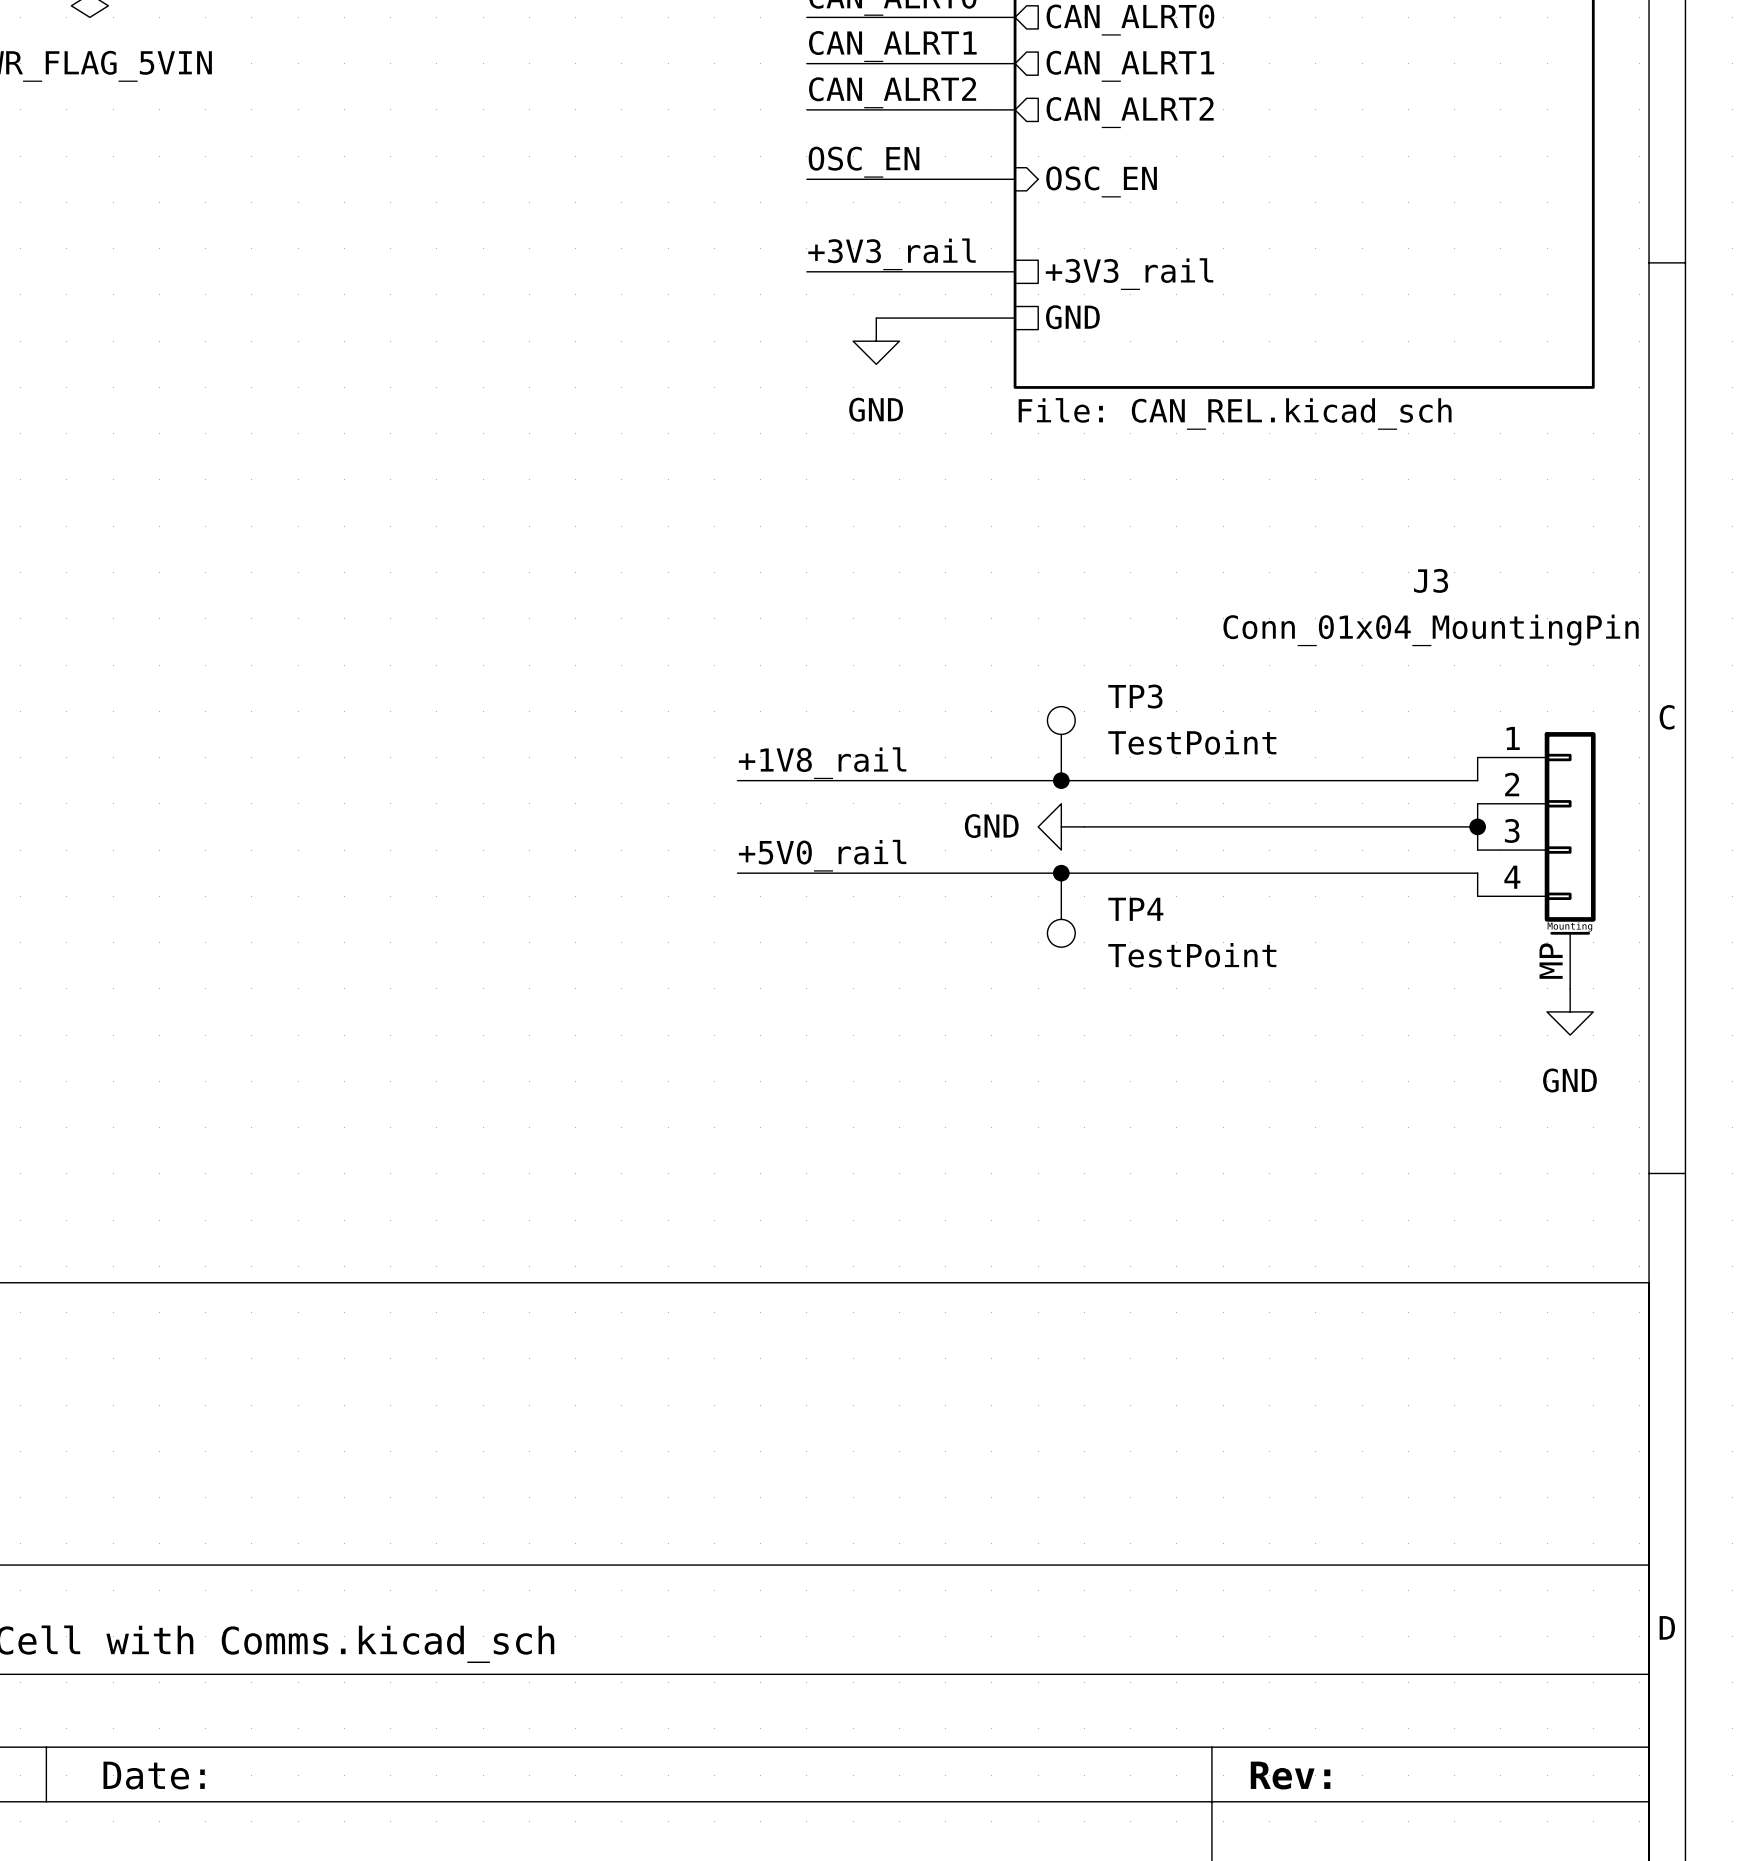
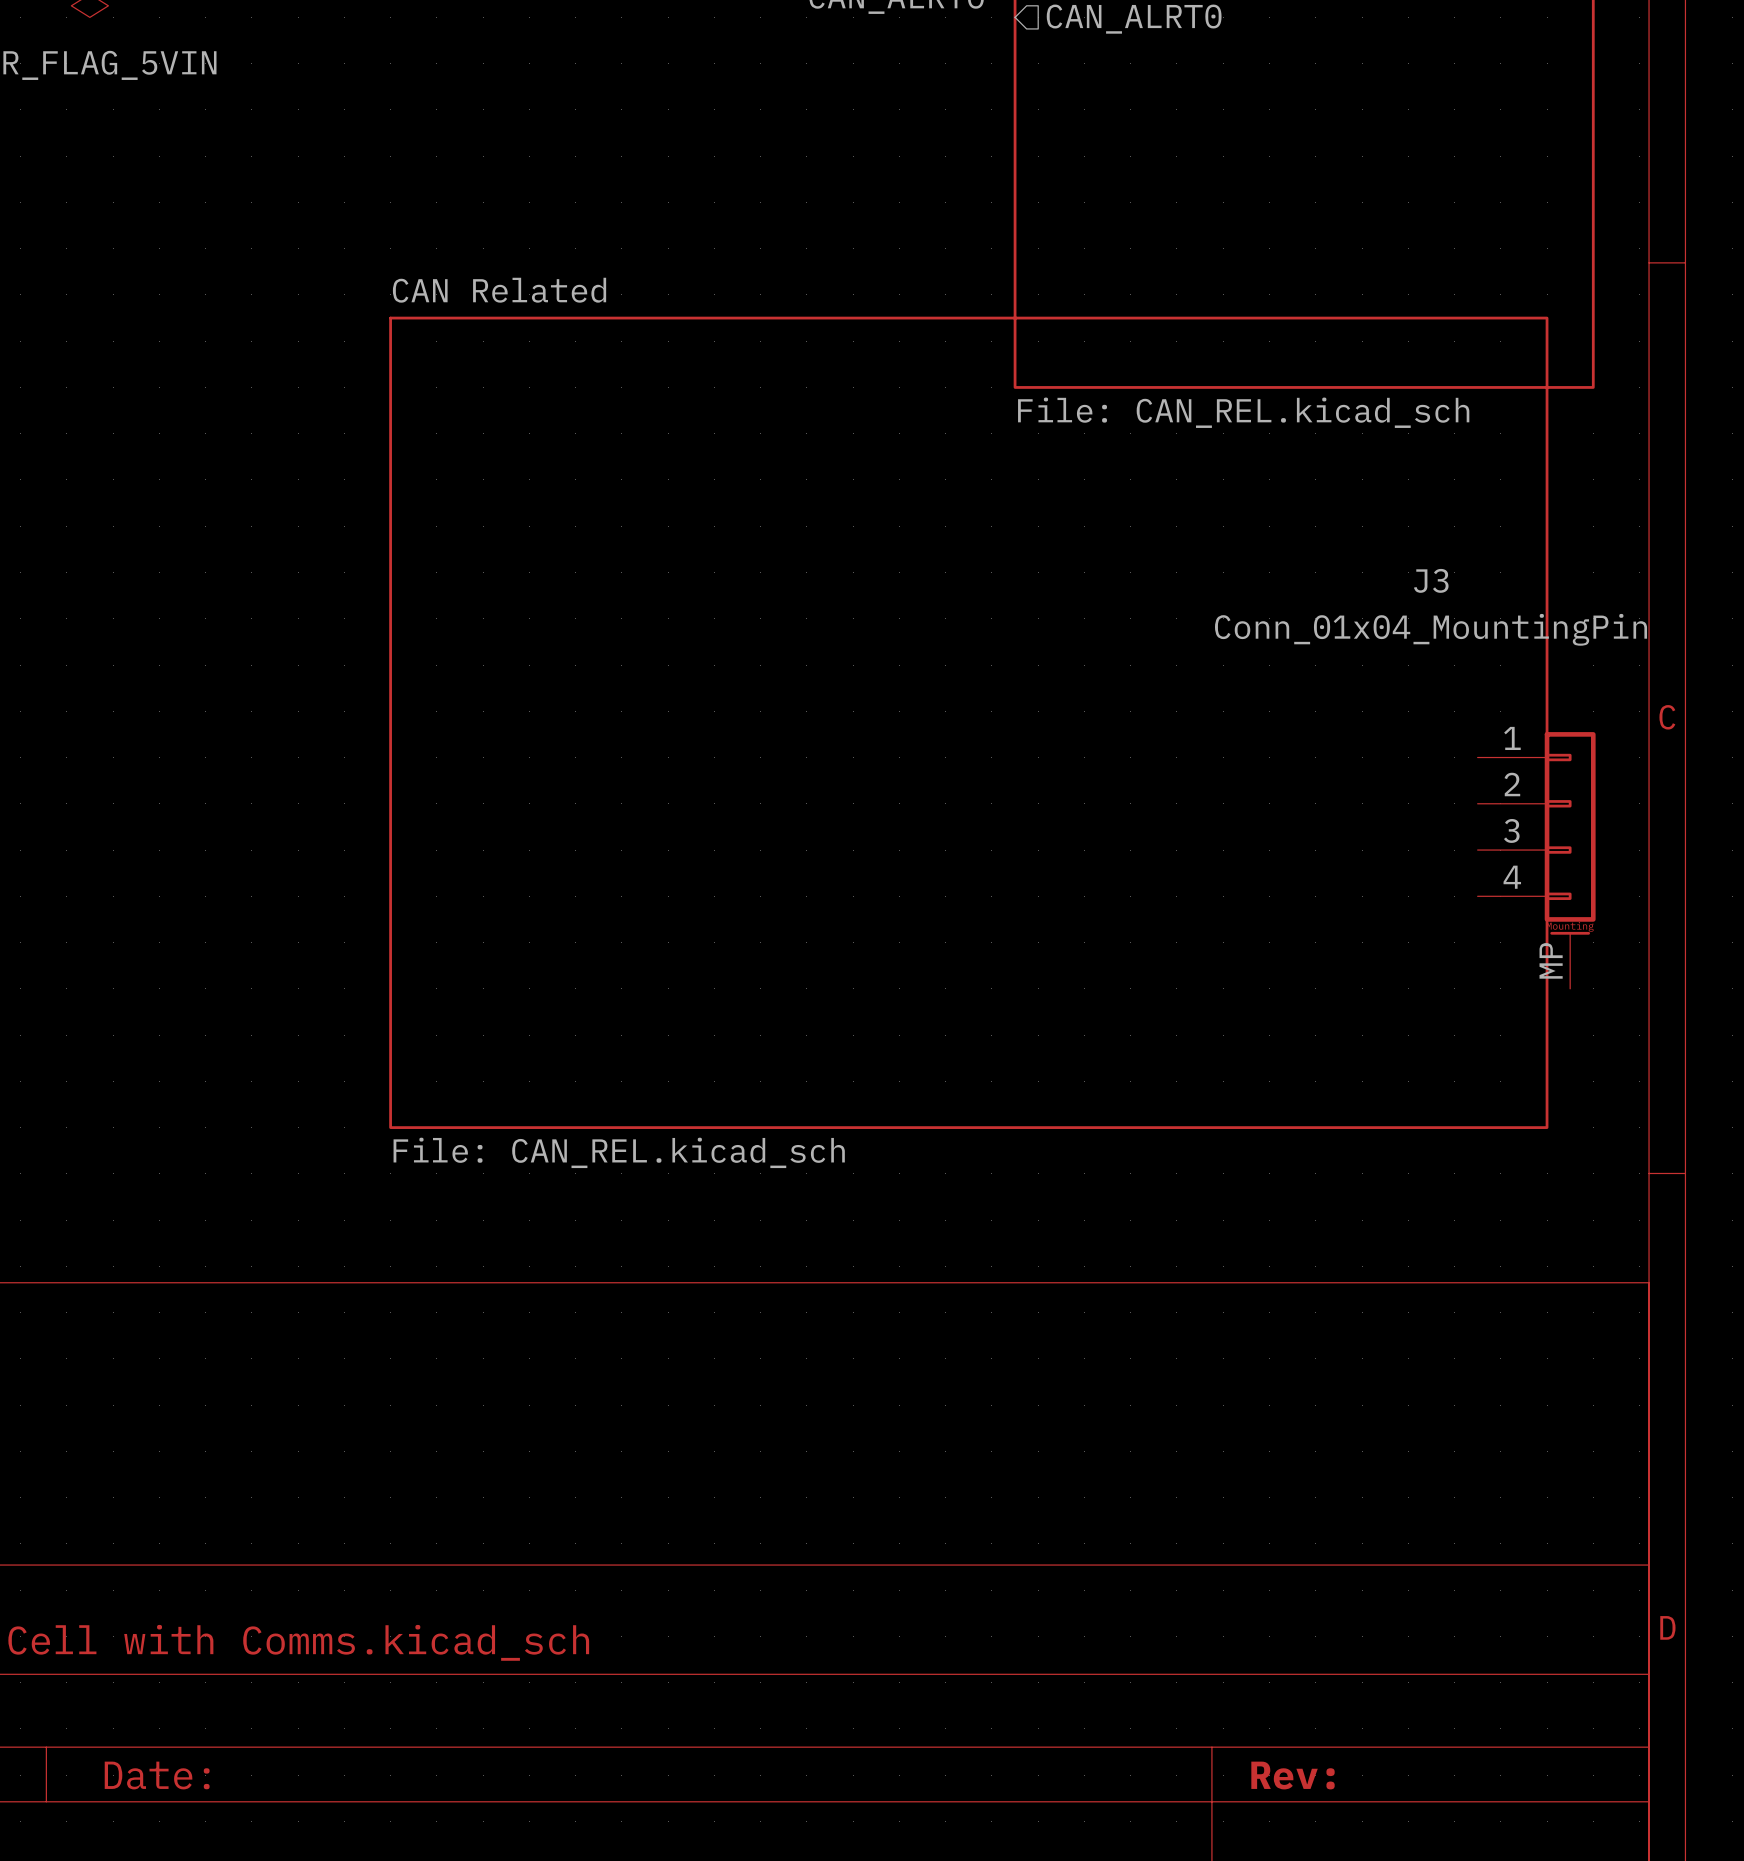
wire: (806, 17) (1015, 17) -> none
label: CAN_ALRT1 (892, 46) -> none
wire: (806, 63) (1015, 63) -> none
sheet pin: CAN_ALRT1 (1130, 66) -> none
label: CAN_ALRT2 (892, 92) -> none
wire: (806, 109) (1015, 109) -> none
sheet pin: CAN_ALRT2 (1130, 112) -> none
label: OSC_EN (864, 162) -> none
wire: (806, 179) (1015, 179) -> none
sheet pin: OSC_EN (1101, 181) -> none
label: +3V3_rail (891, 254) -> none
wire: (806, 271) (1015, 271) -> none
sheet pin: +3V3_rail (1129, 274) -> none
sheet pin: GND (1072, 317) -> none
power symbol: GND (876, 341) -> none
sheet CAN Related: none -> File: CAN_REL.kicad_sch (968, 722)
TP3: TestPoint (1061, 743) -> none
wire: (1477, 757) (1477, 780) (737, 780) -> none
label: +1V8_rail (822, 763) -> none
junction: (1061, 780) -> none
wire: (1477, 803) (1477, 850) -> none
power symbol: GND (1061, 826) -> none
wire: (1084, 826) (1477, 826) -> none
junction: (1477, 826) -> none
label: +5V0_rail (822, 855) -> none
wire: (737, 873) (1477, 873) (1477, 896) -> none
junction: (1061, 873) -> none
TP4: TestPoint (1061, 910) -> none
power symbol: GND (1570, 1011) -> none

